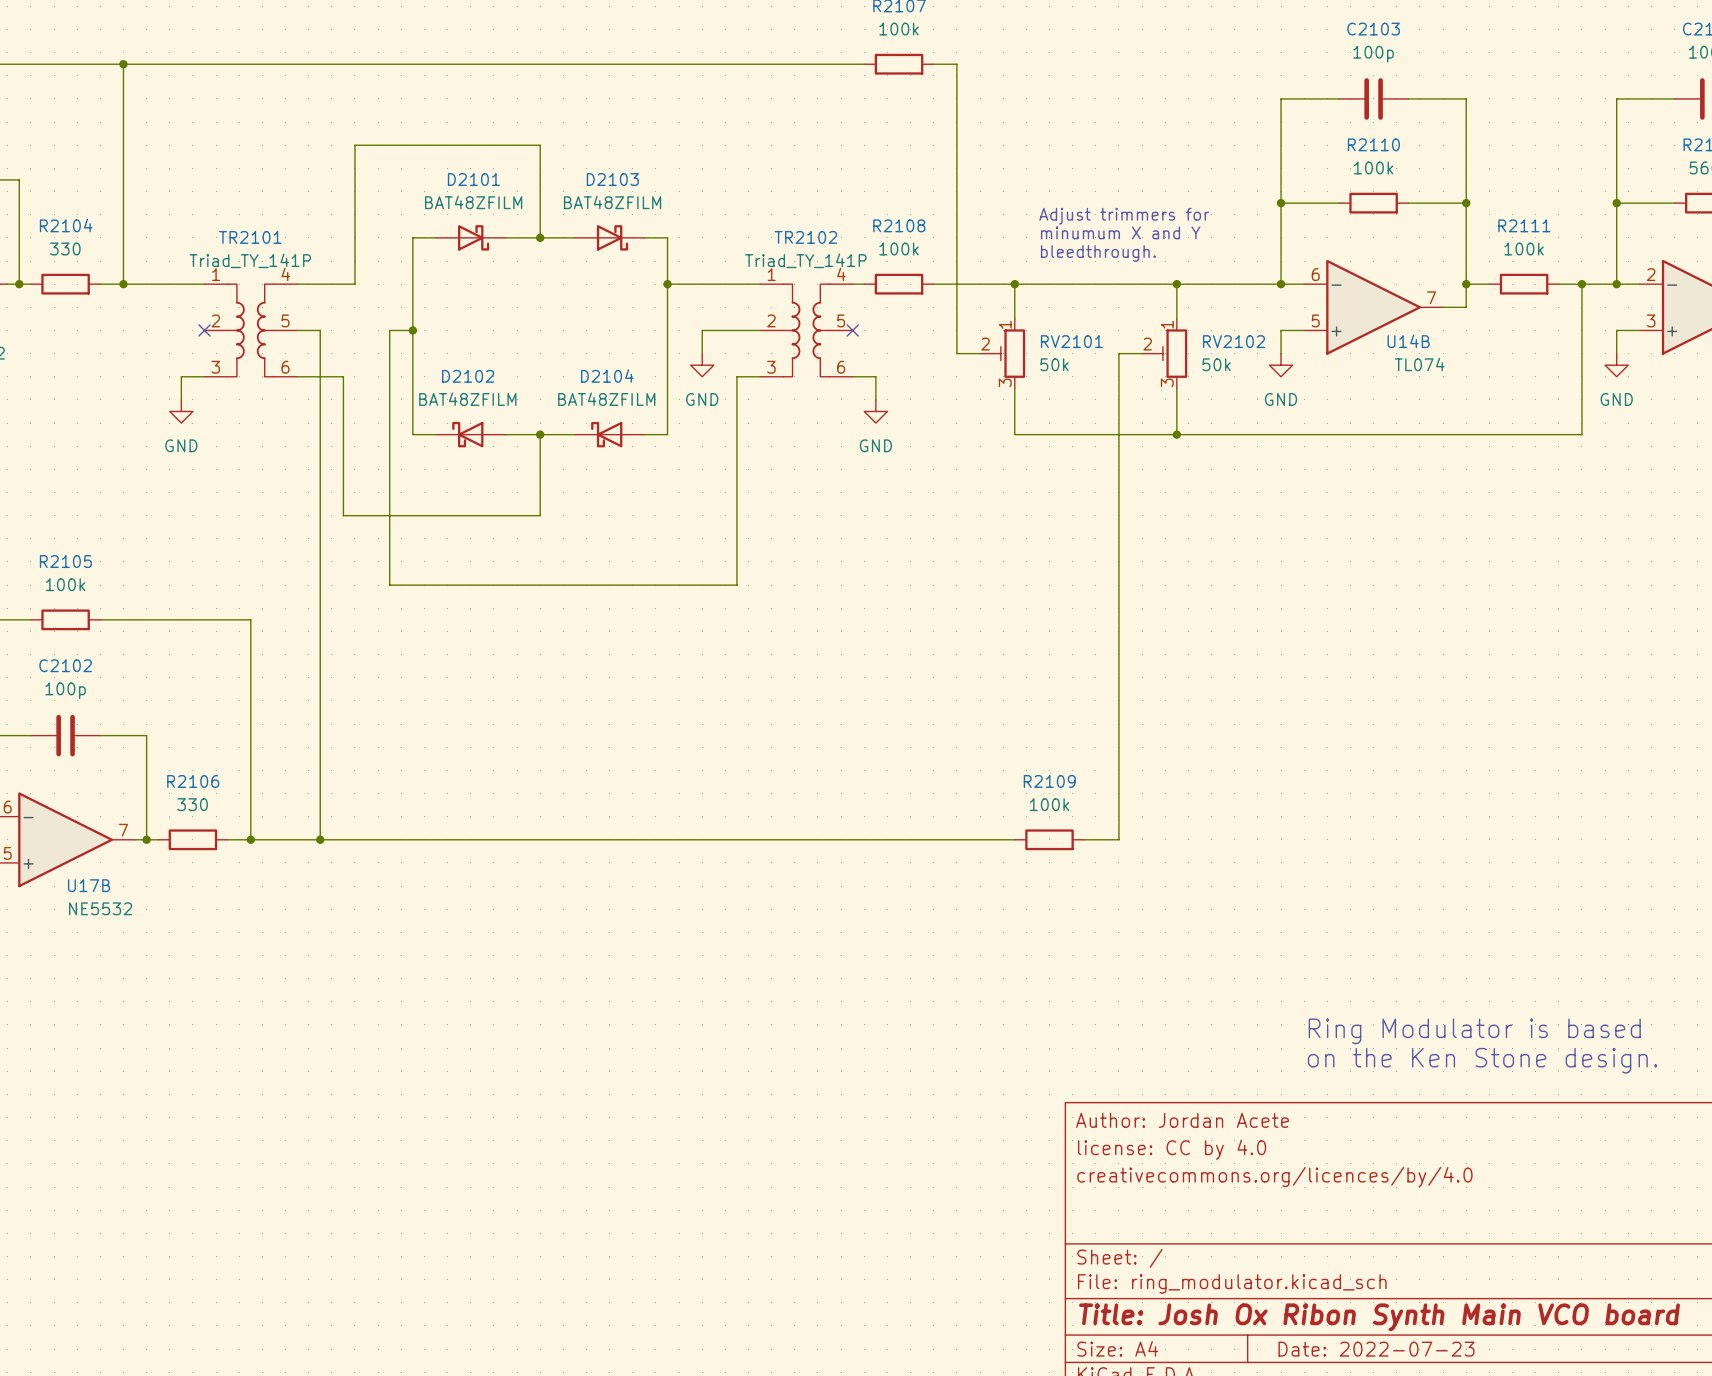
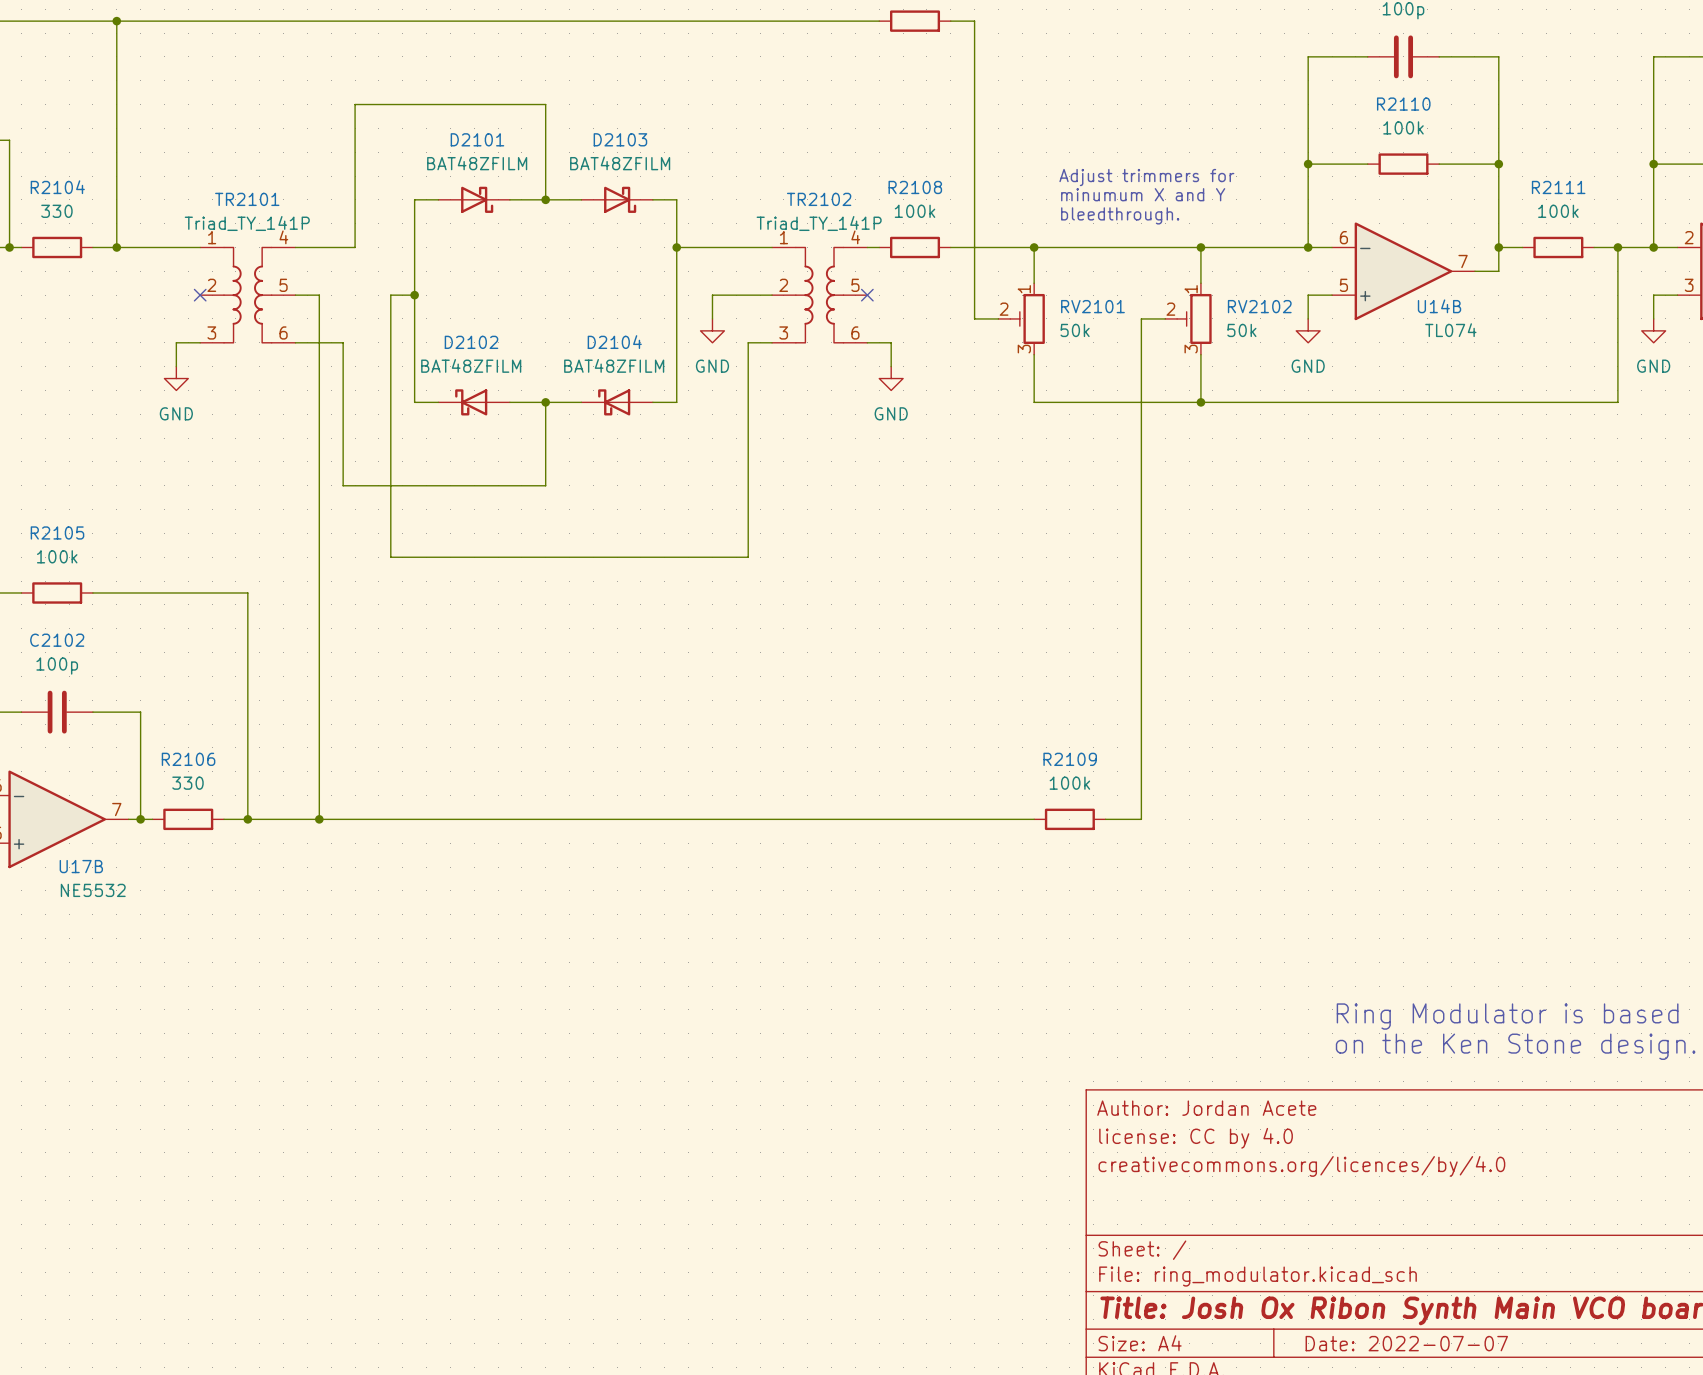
title block: Date: 2022-07-23 (1376, 1349) -> Date: 2022-07-07 (1406, 1343)

